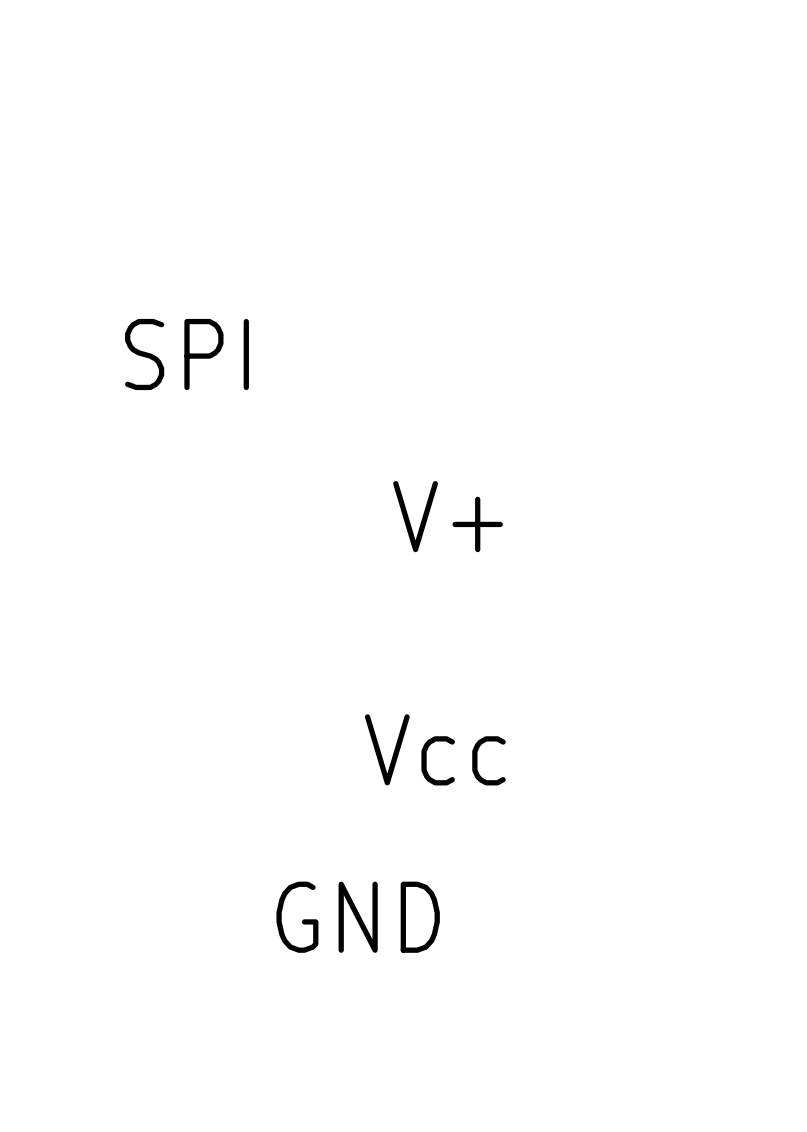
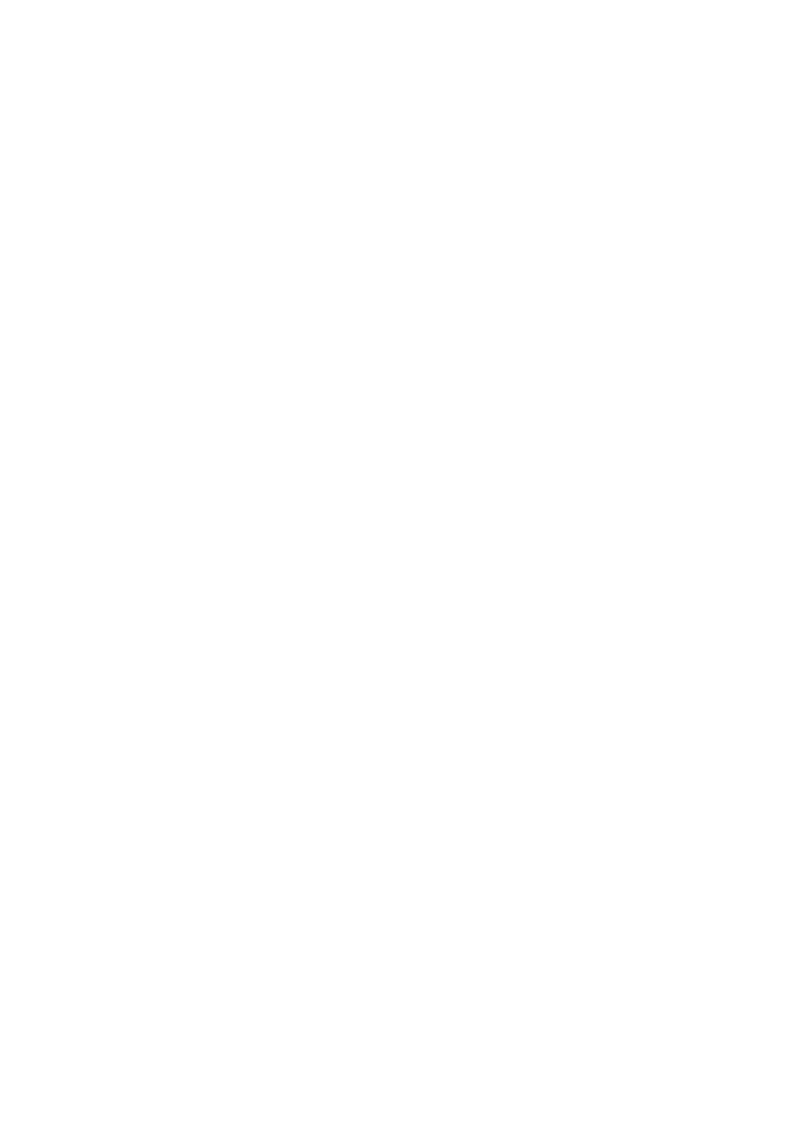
text: SPI (186, 354) -> none
text: V+ (448, 516) -> none
text: Vcc (435, 749) -> none
text: GND (358, 917) -> none

